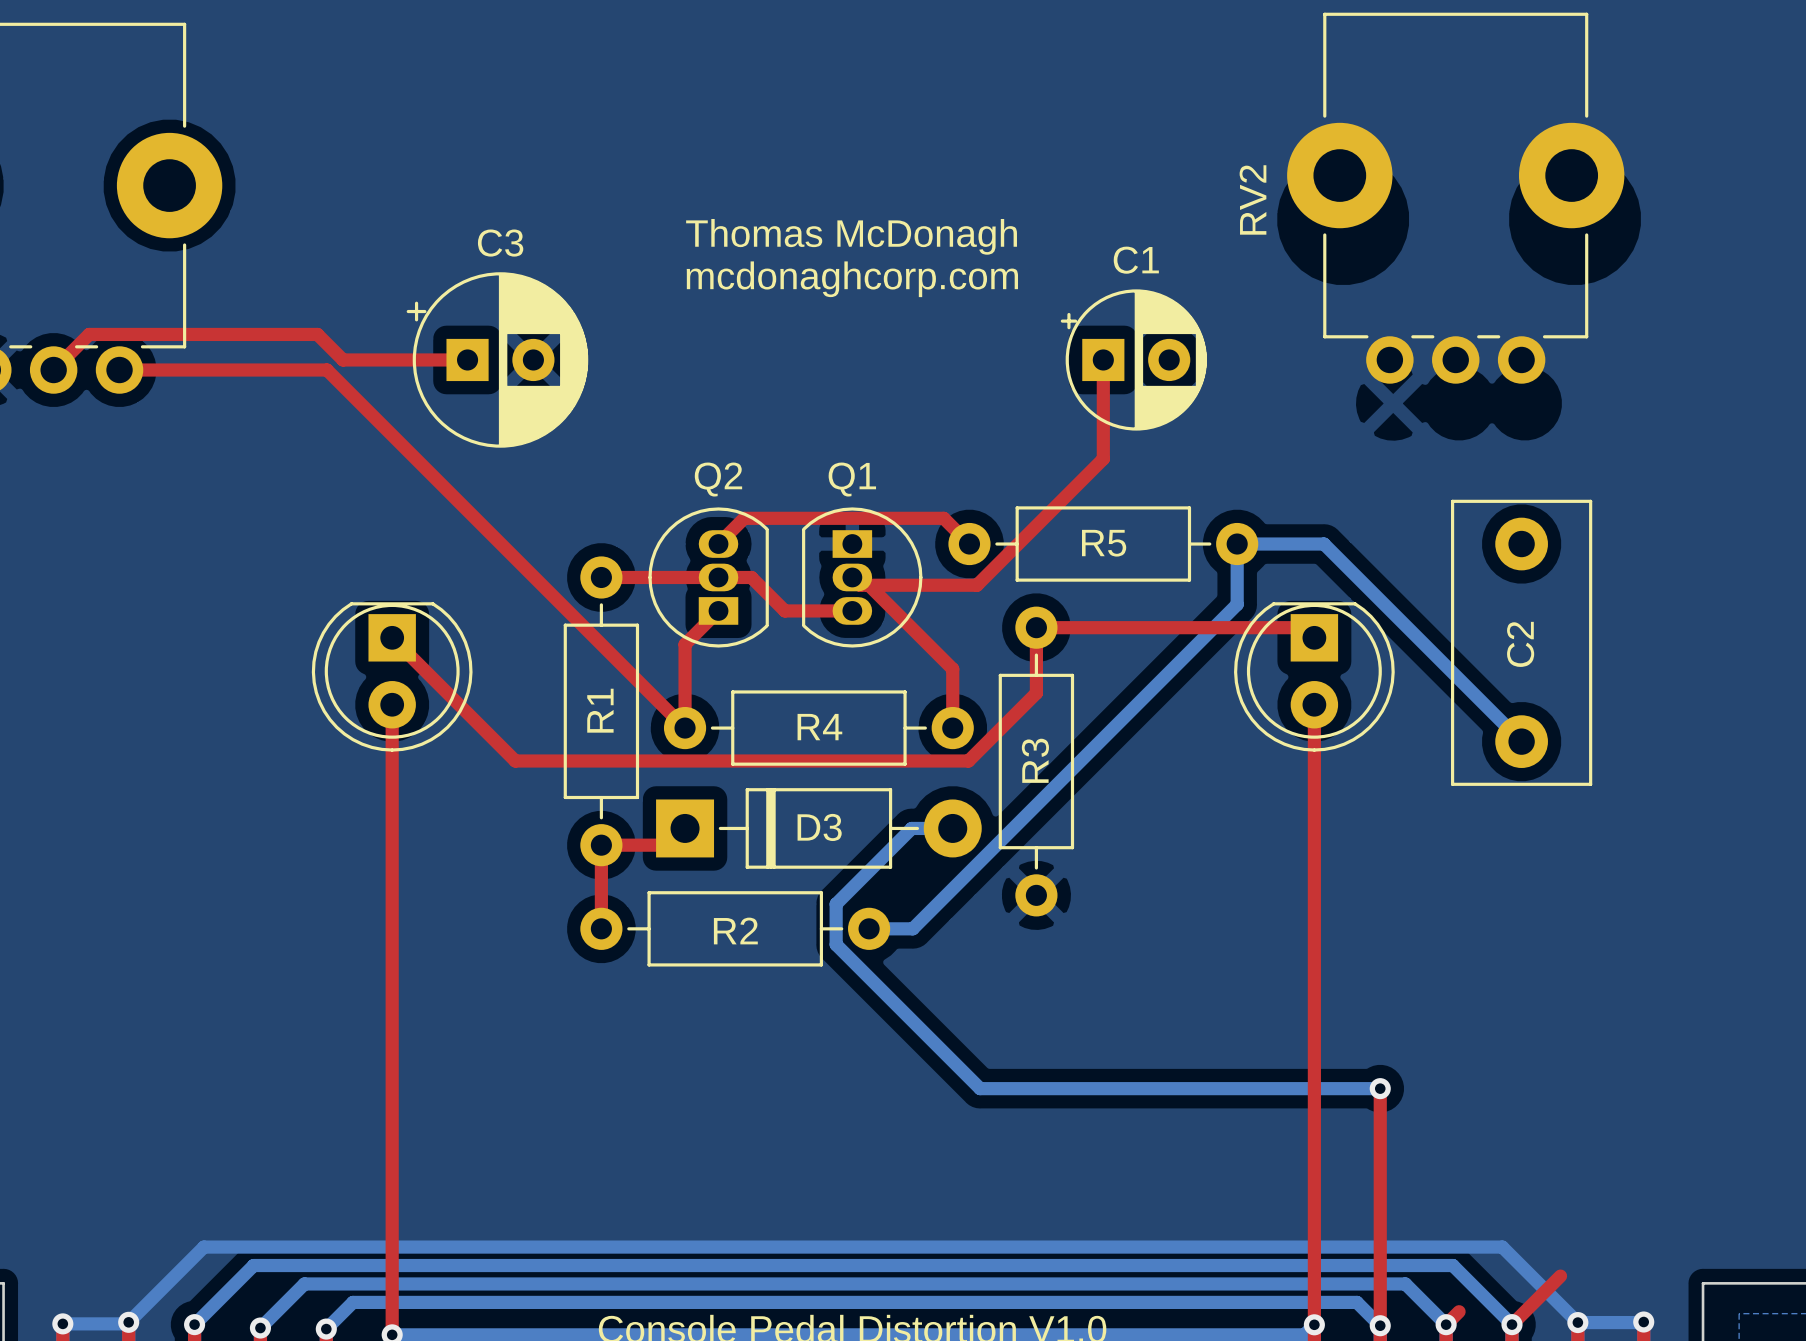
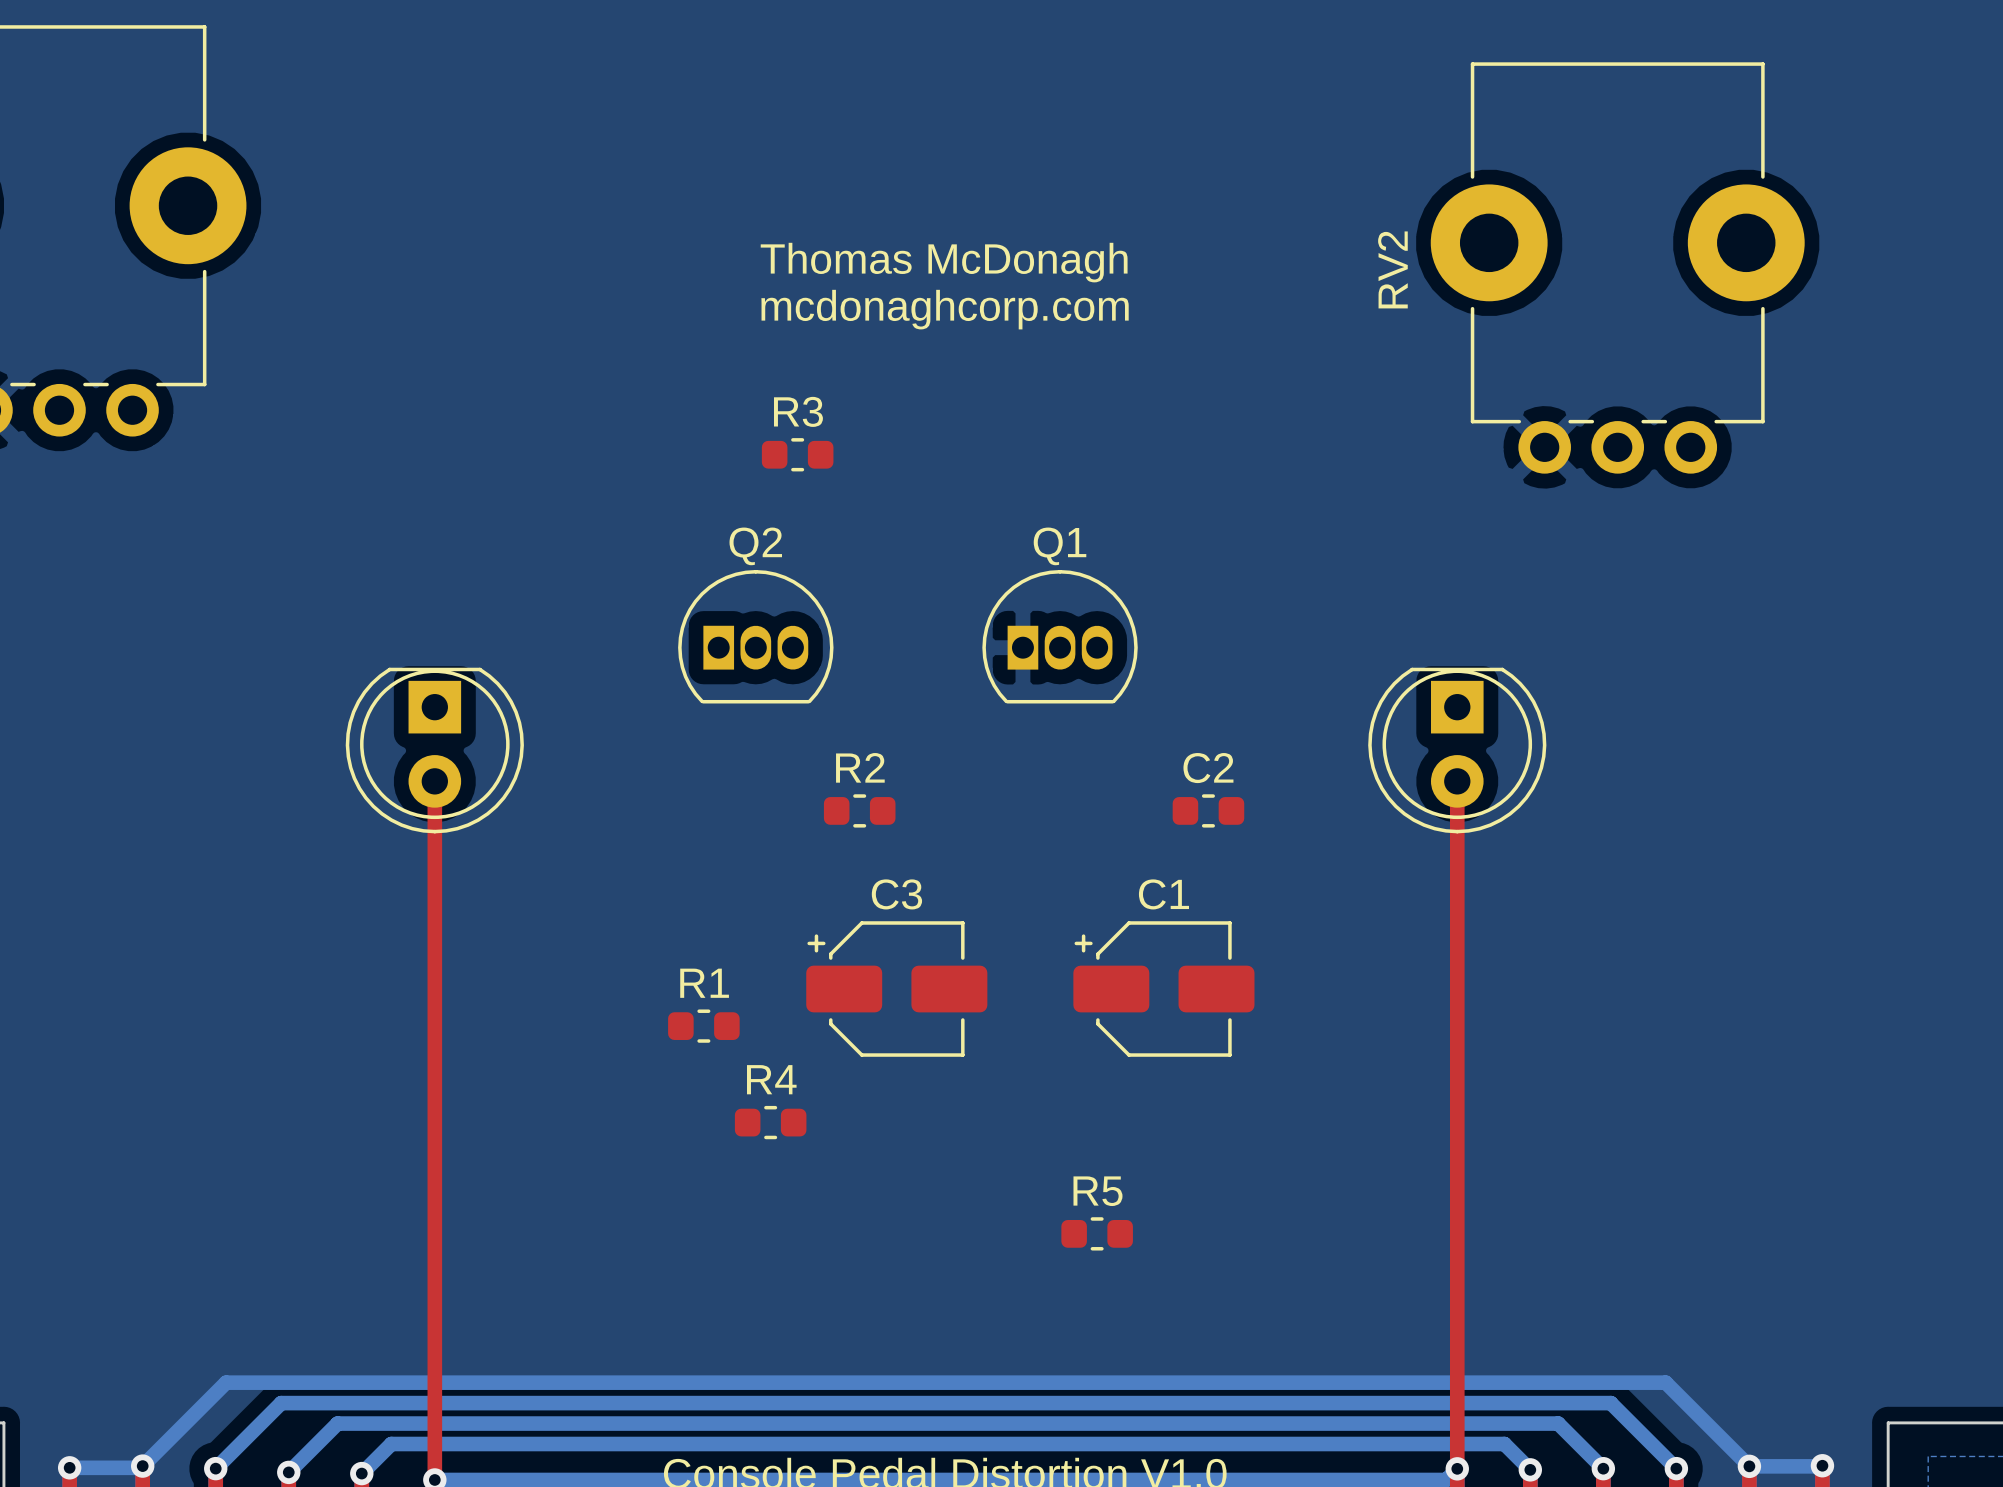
RV2 position: (1455, 198) -> (1617, 267)
C3 footprint: [406, 272, 589, 448] -> [806, 921, 988, 1057]
C1 footprint: [1060, 289, 1207, 431] -> [1073, 921, 1255, 1057]
top track: (467, 359) (343, 359) (317, 334) (89, 334) (53, 370) -> none
top track: (1103, 359) (1103, 458) (976, 585) (860, 585) (852, 577) (861, 577) (952, 669) (952, 728) -> none
top track: (119, 370) (327, 370) (685, 728) (685, 644) (718, 610) -> none
C2 footprint: [1451, 499, 1593, 786] -> [1172, 794, 1245, 828]
R5 footprint: [948, 506, 1259, 582] -> [1061, 1217, 1133, 1251]
top track: (718, 544) (744, 518) (943, 518) (969, 544) -> none
R1 footprint: [563, 556, 640, 867] -> [668, 1009, 740, 1043]
top track: (601, 577) (751, 577) (784, 610) (852, 610) -> none
Q2 rotation: 0° (708, 577) -> 90° clockwise (755, 636)
Q1 rotation: 0° (862, 577) -> 90° counterclockwise (1060, 636)
Q1 position: (862, 577) -> (1060, 636)
R3 footprint: [998, 606, 1075, 917] -> [761, 438, 834, 472]
top track: (392, 637) (515, 761) (968, 761) (1036, 693) (1036, 627) (1304, 627) (1314, 637) -> none
R4 footprint: [663, 690, 974, 766] -> [734, 1105, 807, 1140]
bottom track: (1521, 741) (1324, 544) (1237, 544) (1237, 604) (912, 928) (869, 928) -> none
top track: (685, 828) (668, 845) (601, 845) (601, 928) -> none
D3: (818, 828) -> none
bottom track: (952, 828) (911, 828) (836, 904) (836, 944) (980, 1088) (1380, 1088) -> none
R2 footprint: [580, 891, 891, 967] -> [823, 794, 896, 828]
top track: (1380, 1088) (1380, 1325) -> none
via: (1380, 1088) -> none
top track: (1560, 1276) (1512, 1324) -> none
top track: (1459, 1311) (1446, 1324) -> none

